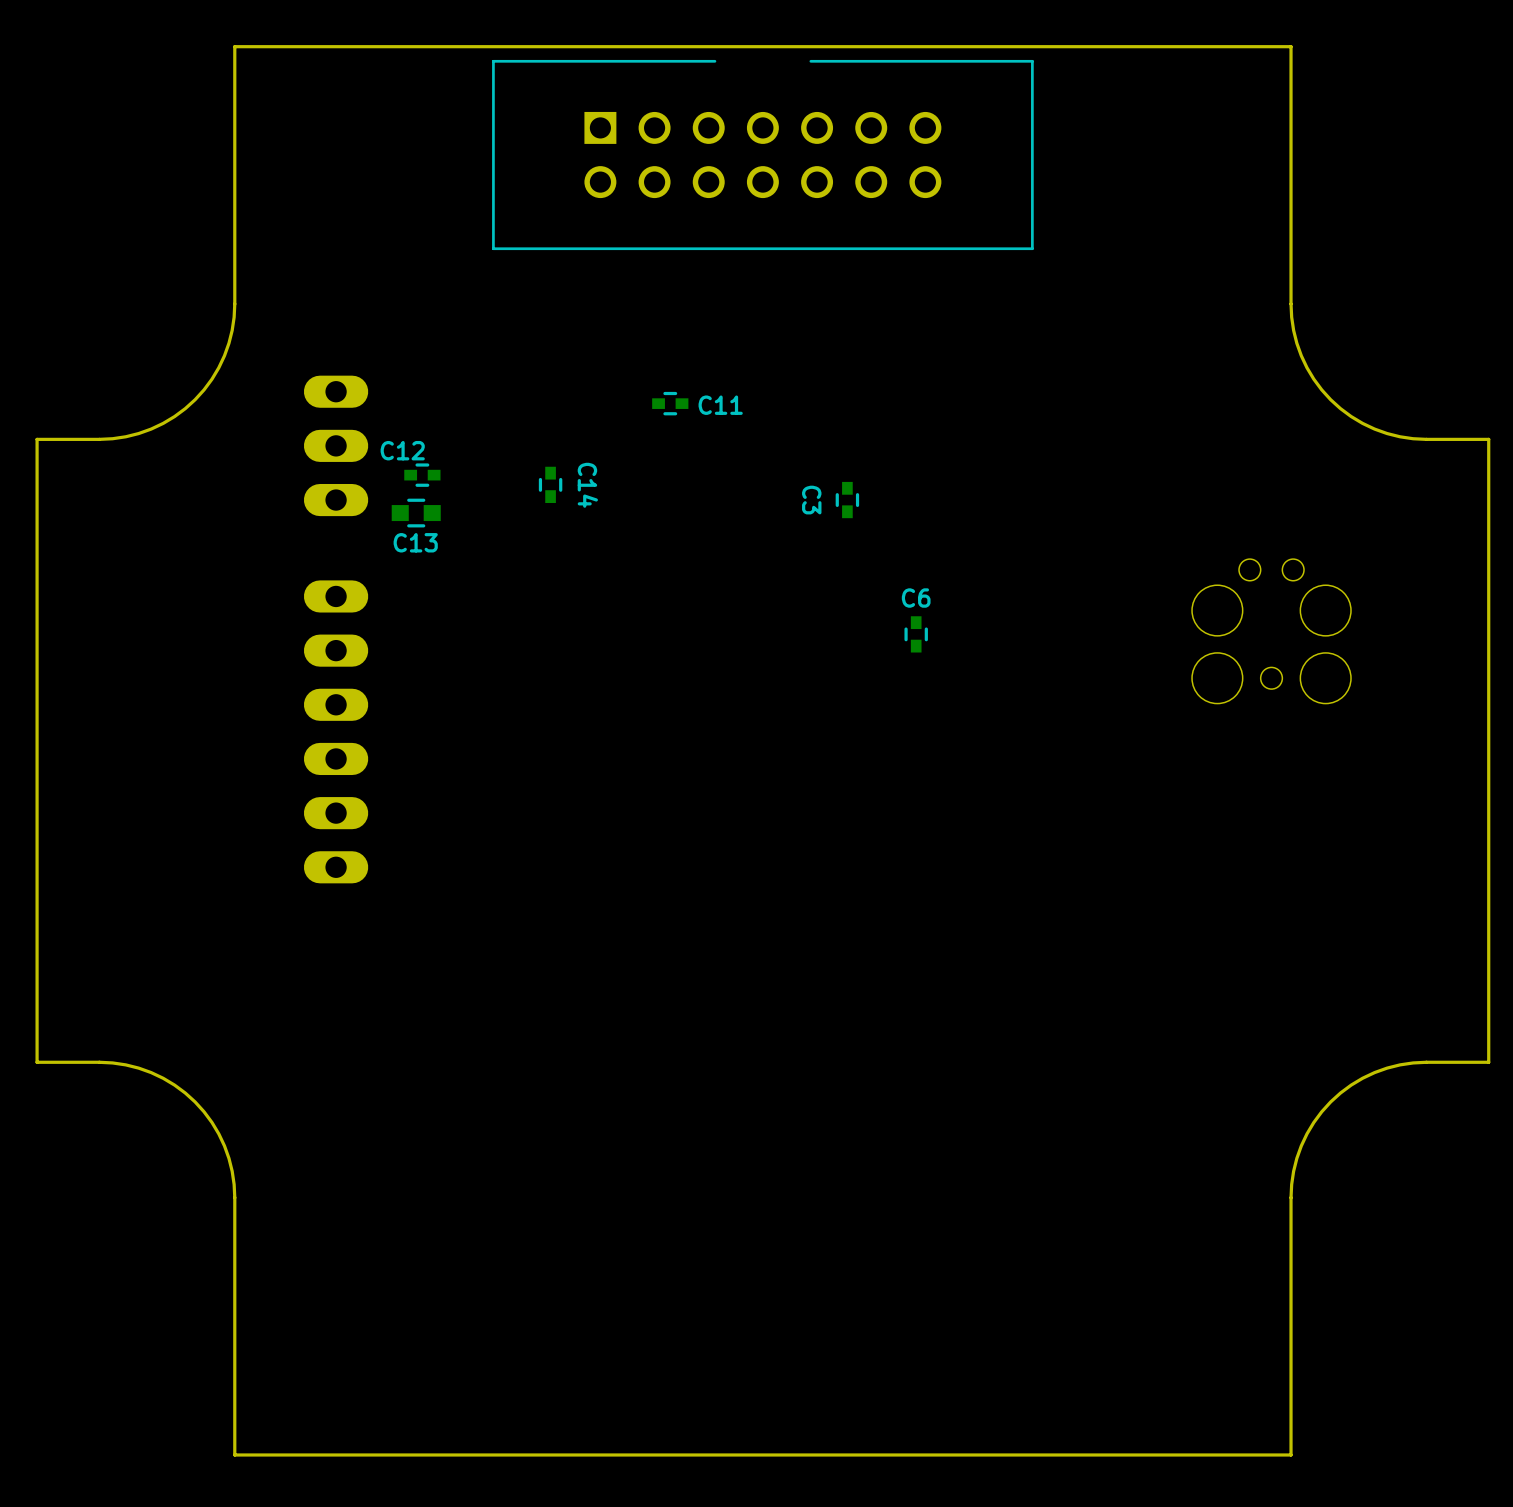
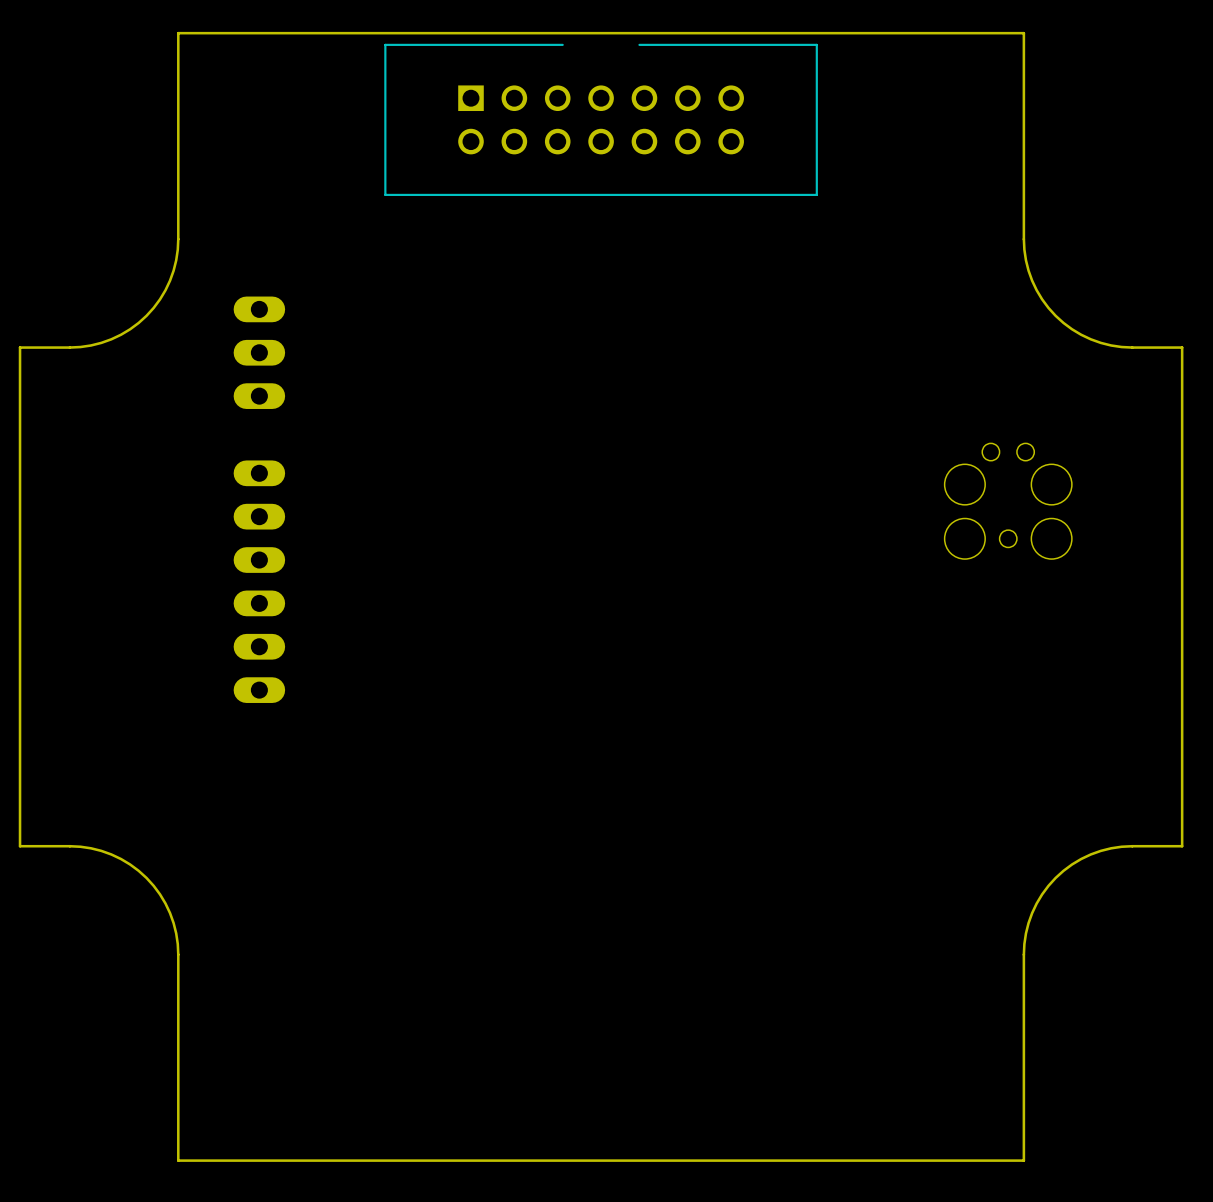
C11: (670, 403) -> none
C12: (422, 475) -> none
C14: (550, 484) -> none
C3: (847, 500) -> none
C13: (416, 513) -> none
C6: (916, 634) -> none

